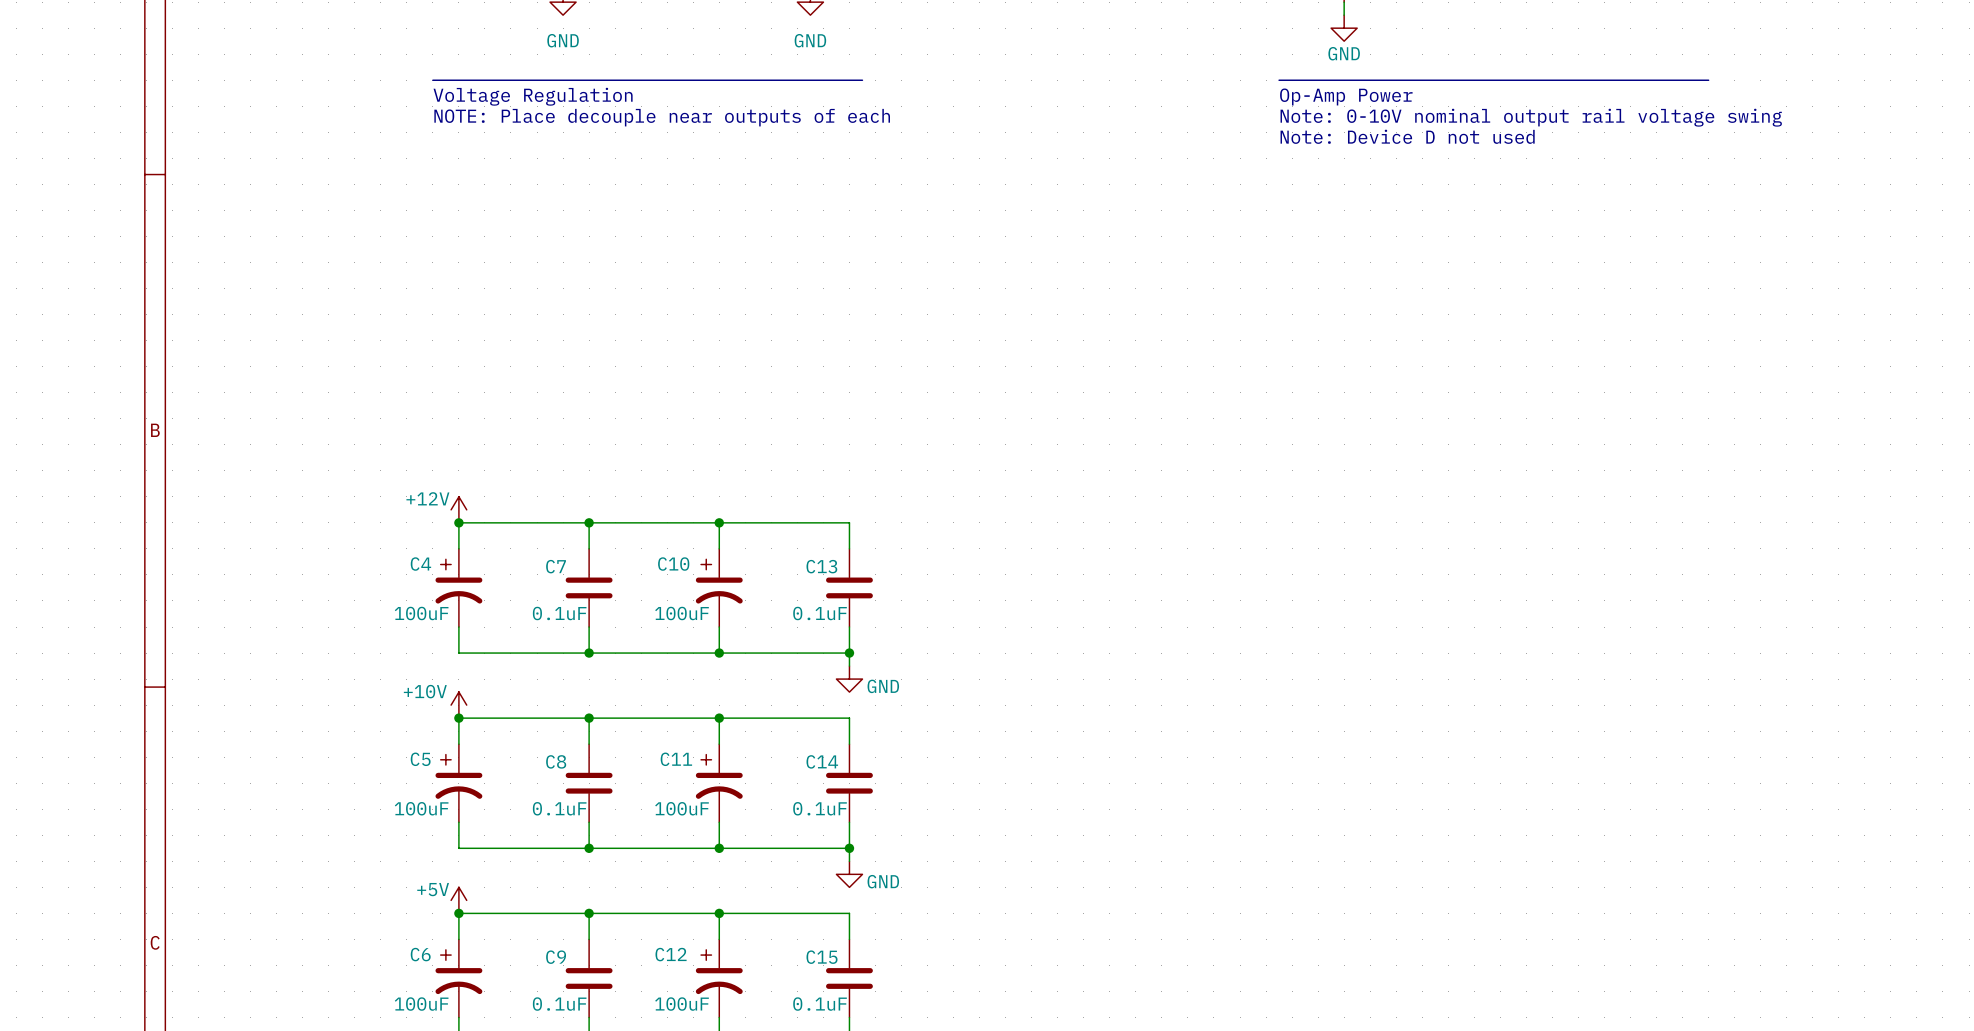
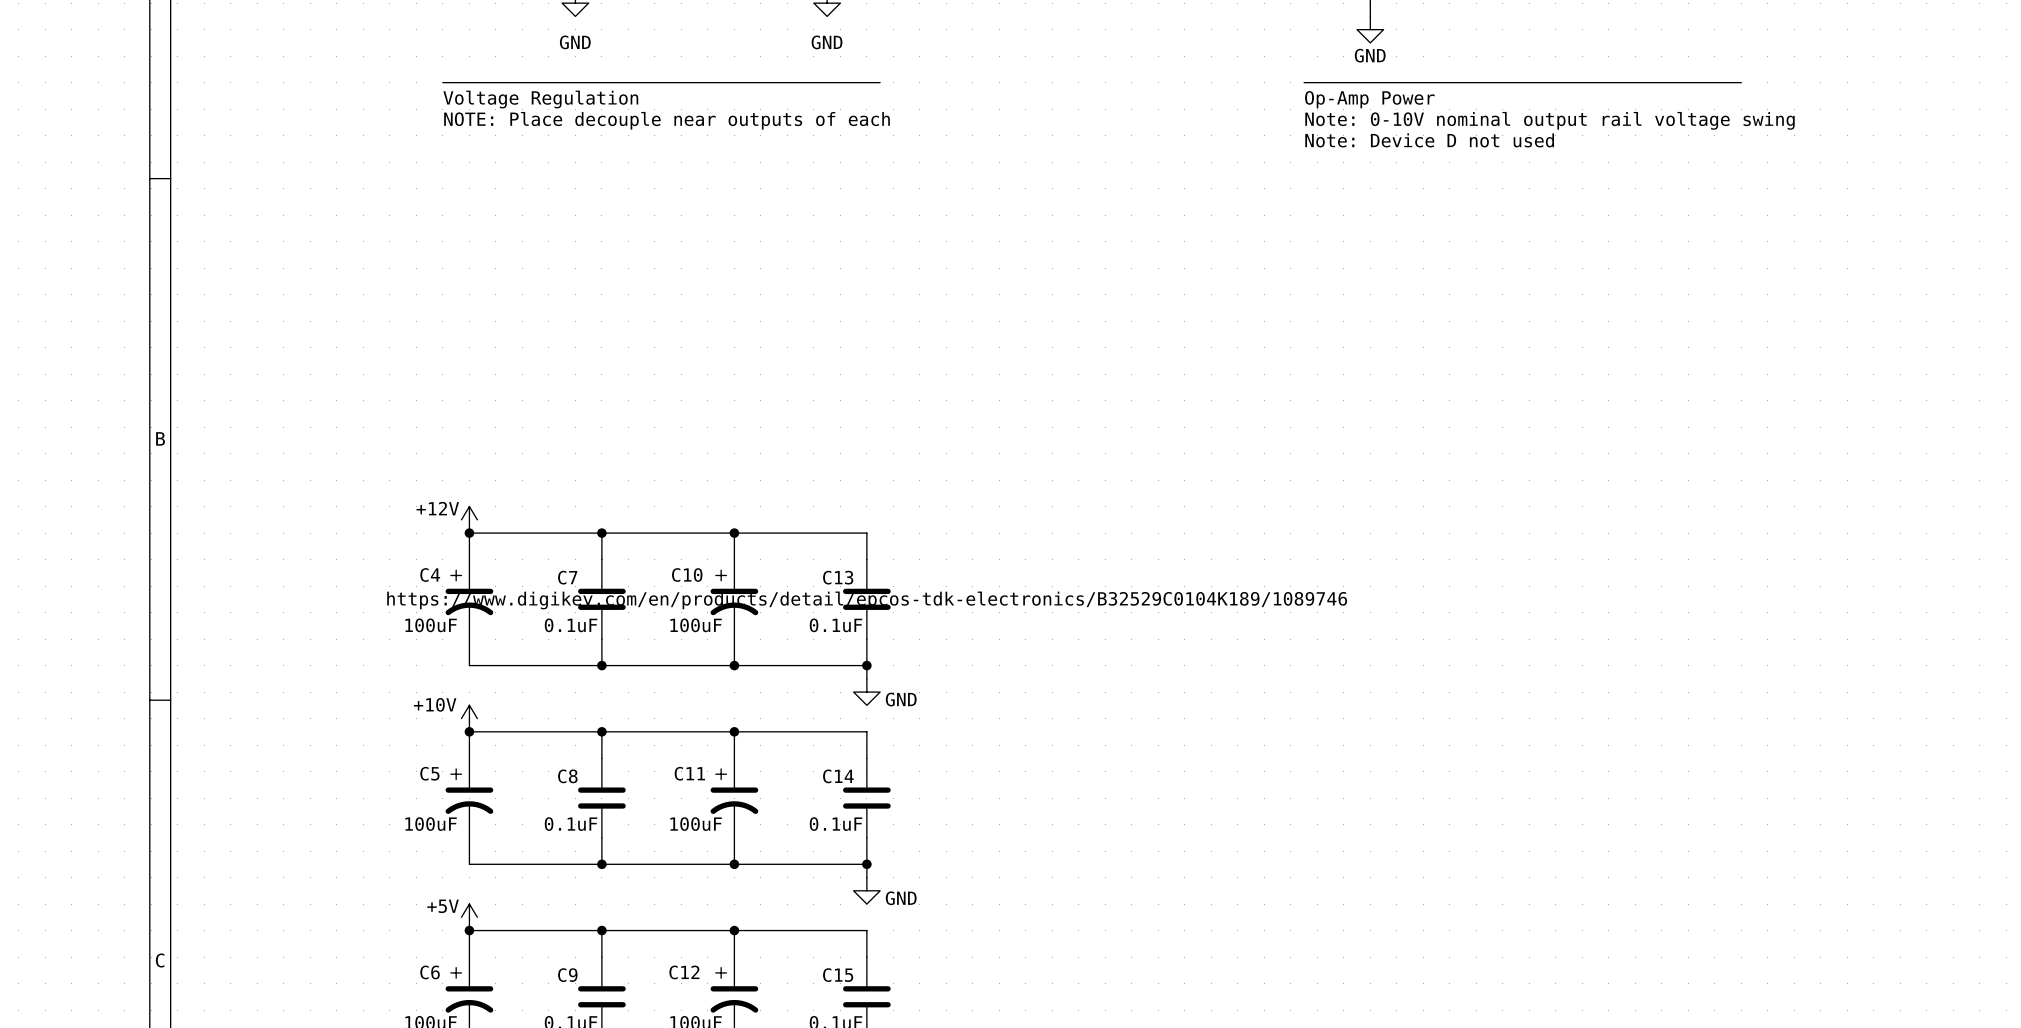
C13 text: none -> https://www.digikey.com/en/products/detail/epcos-tdk-electronics/B32529C0104K189/1089746 (867, 600)

